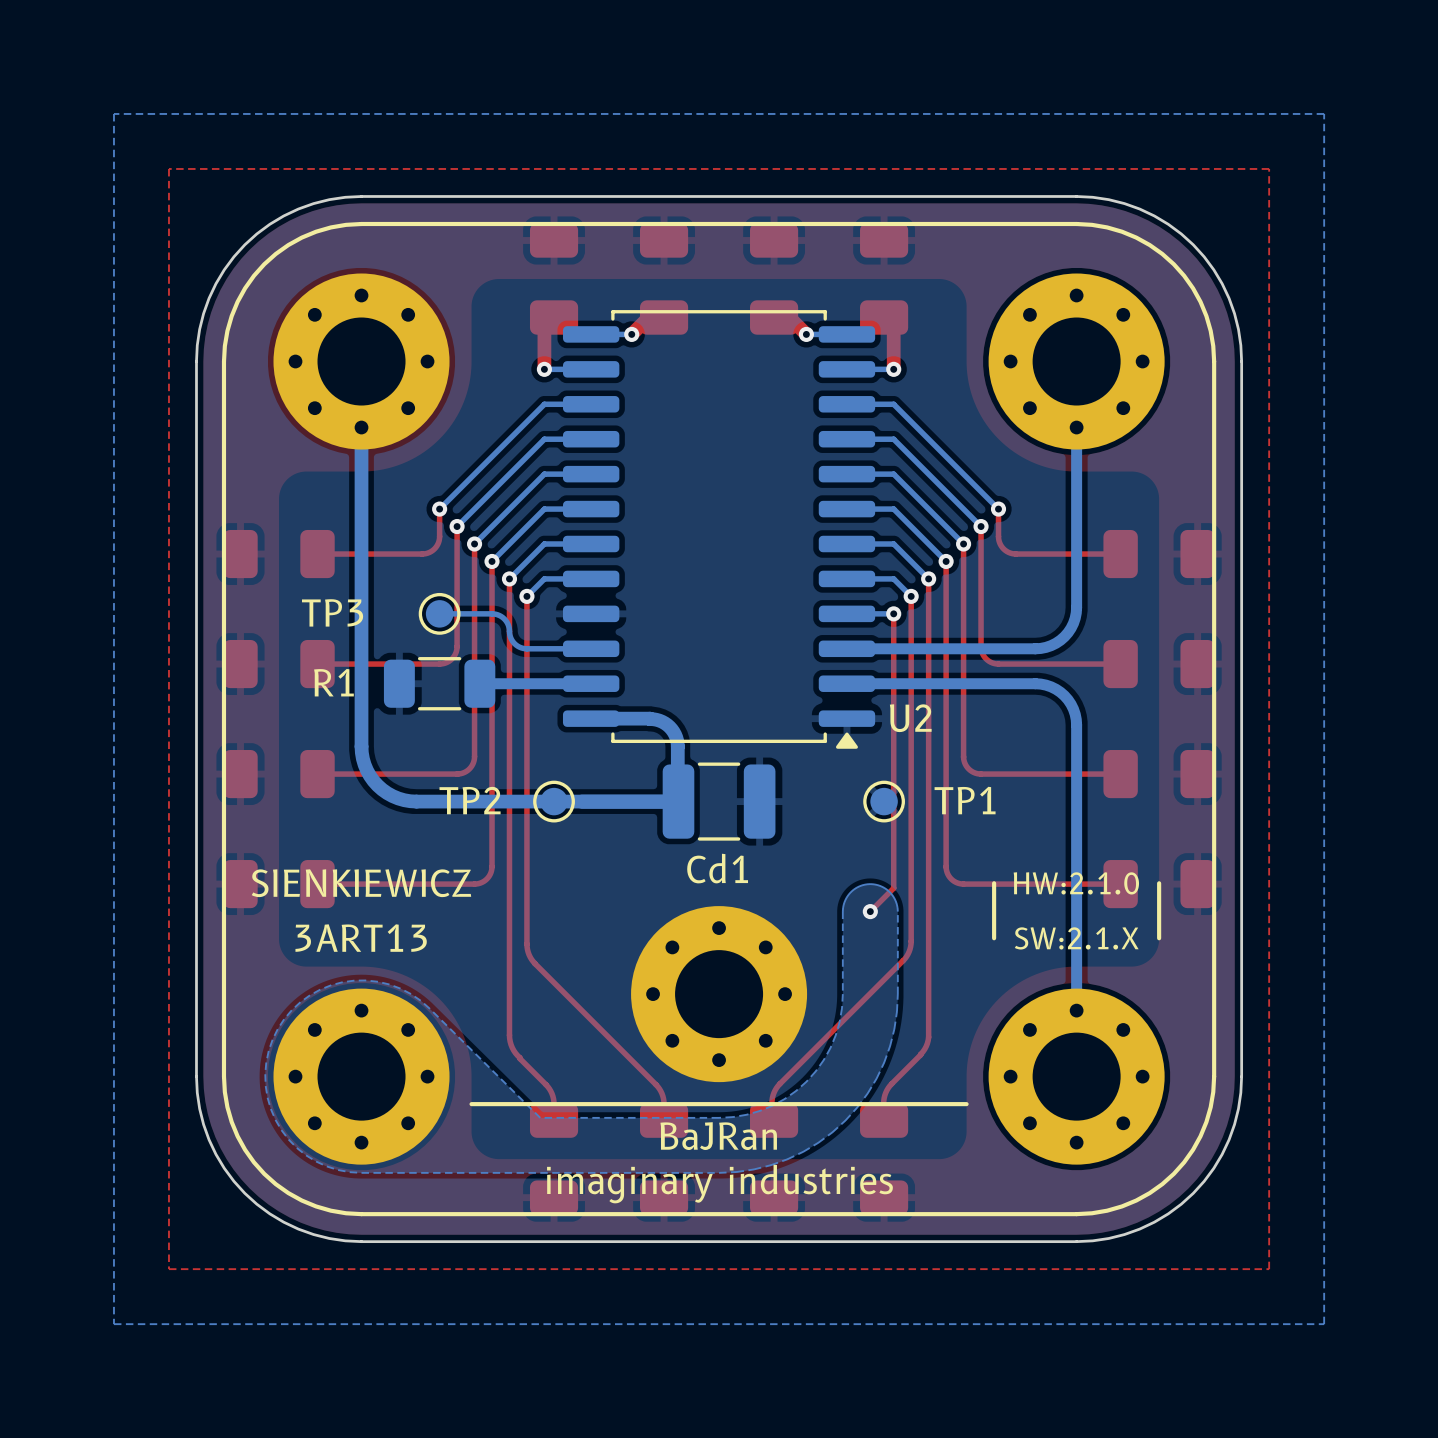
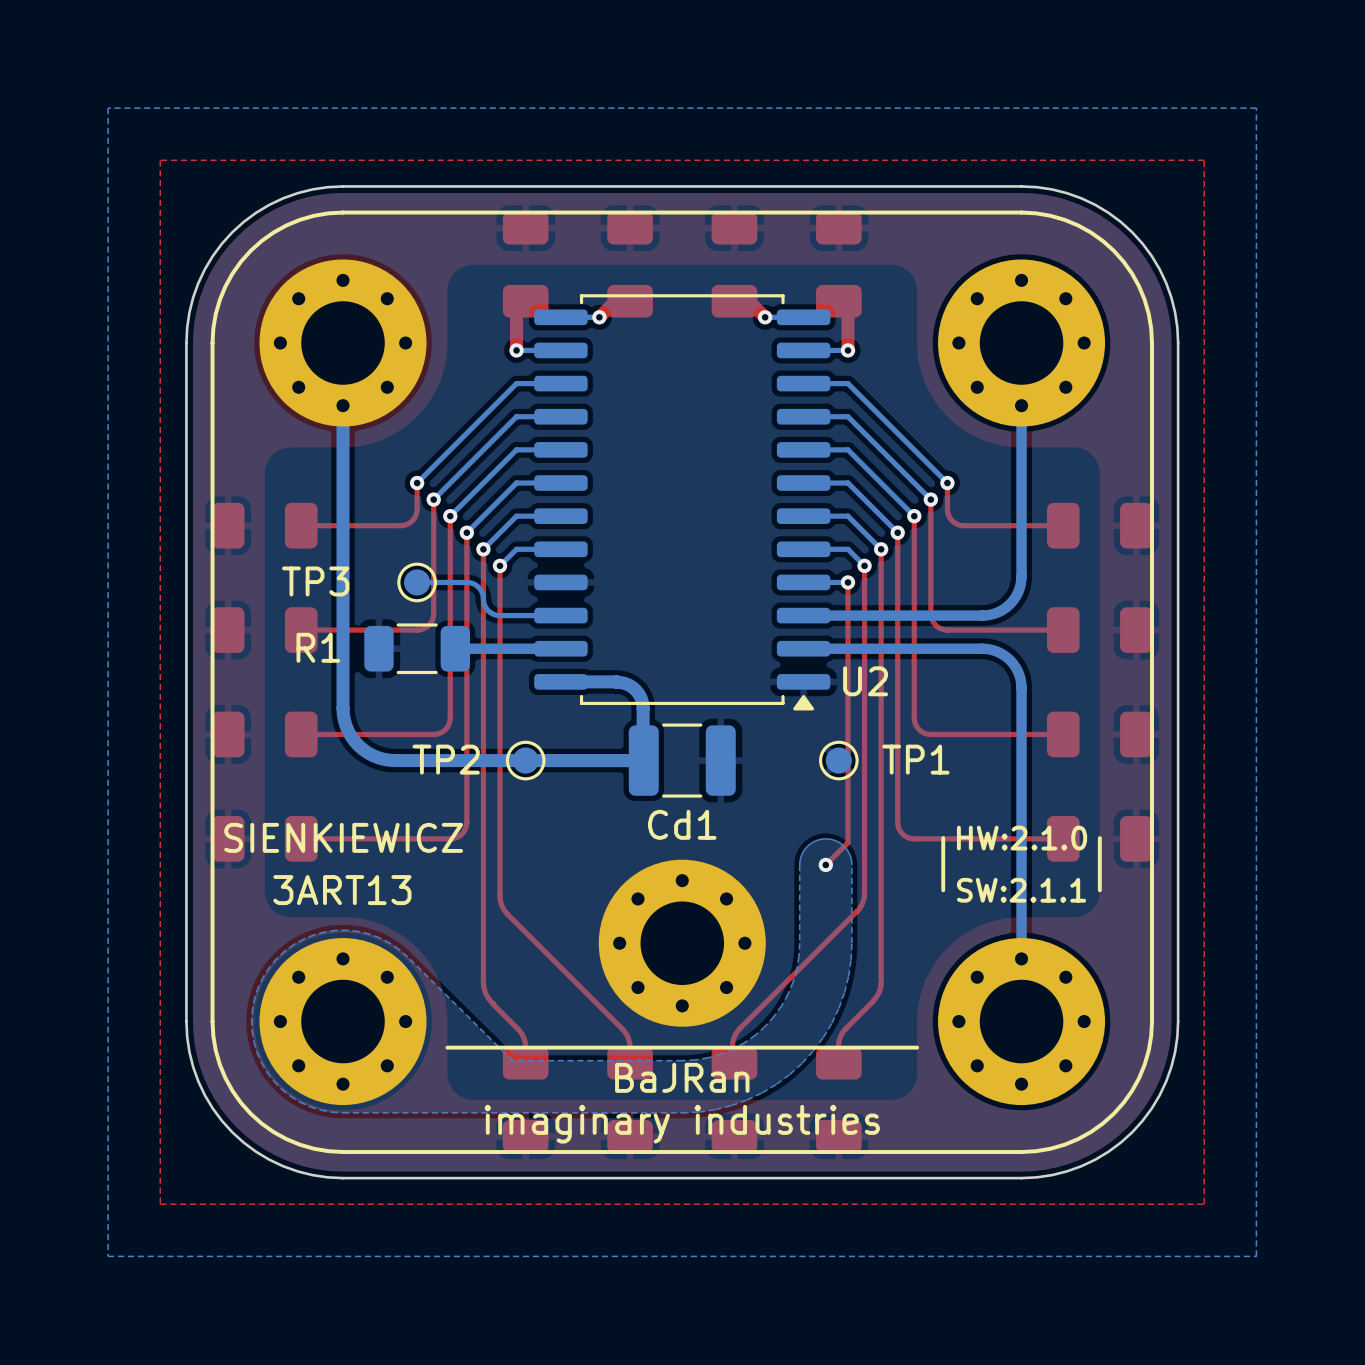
text: SW:2.1.X (1076, 938) -> SW:2.1.1 (1021, 890)

